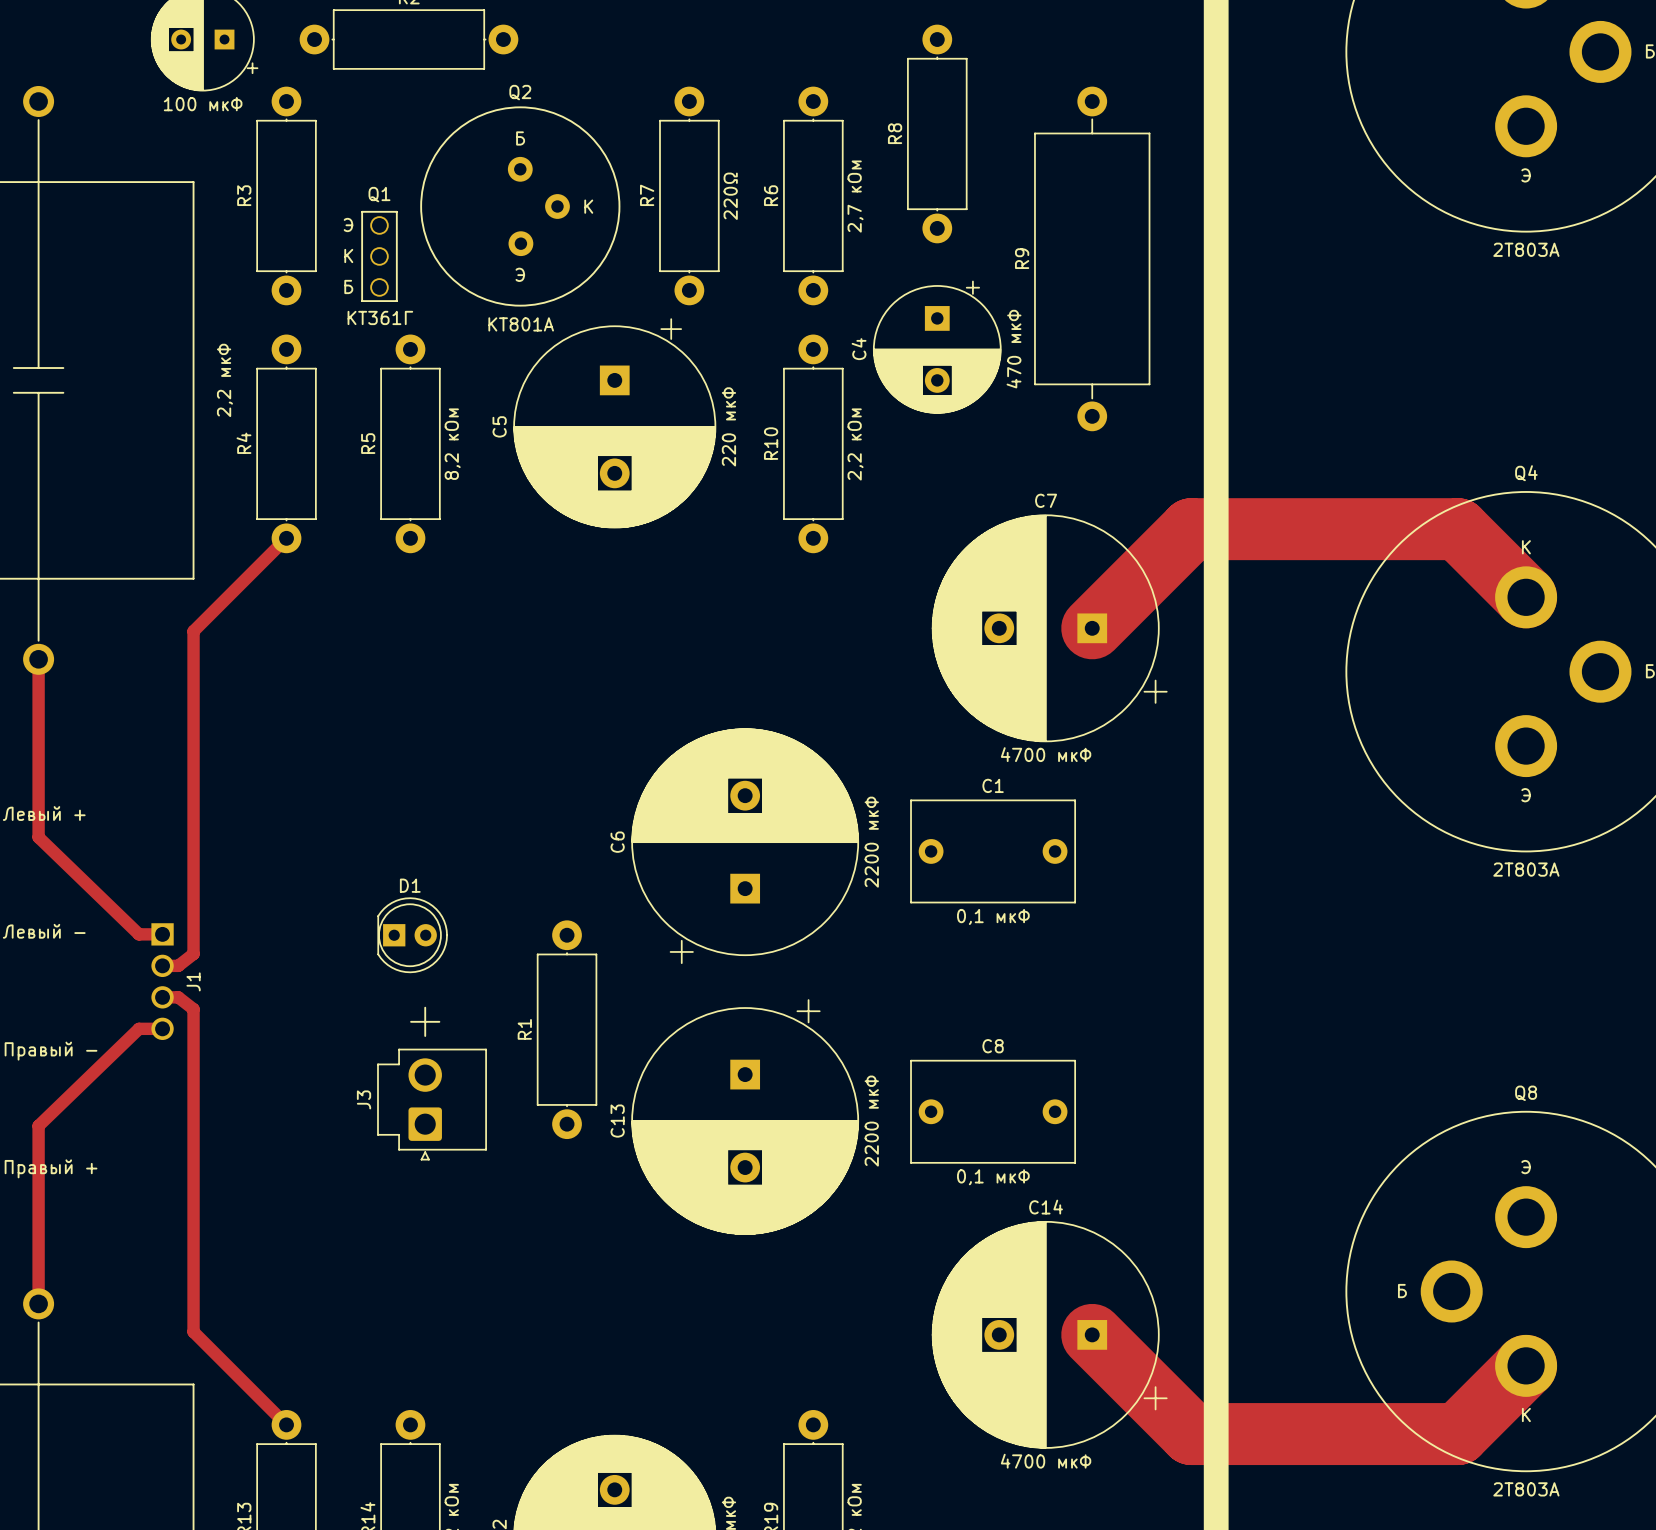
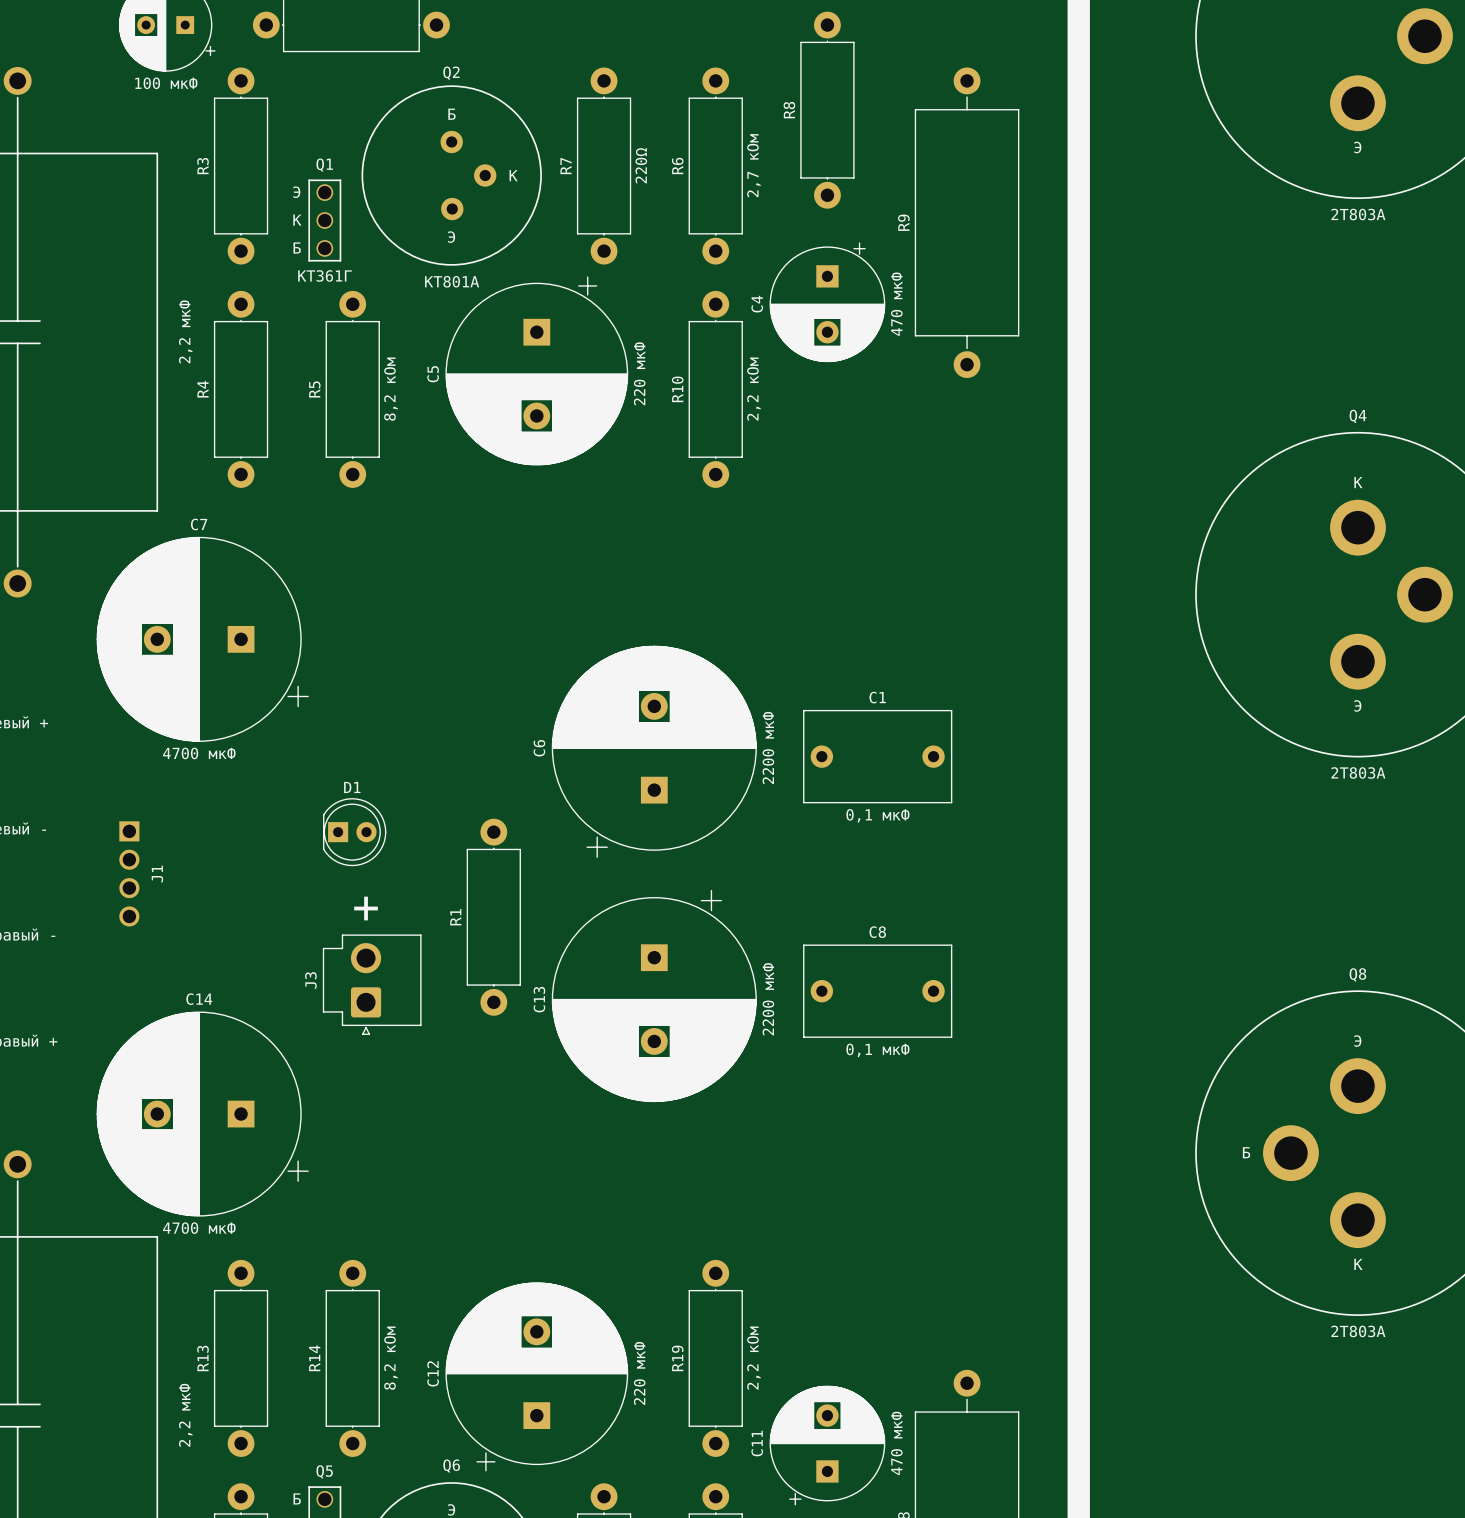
track: (286, 538) (193, 631) (193, 954) (178, 965) (162, 965) -> none
track: (1526, 597) (1457, 529) (1191, 529) (1092, 628) -> none
C7 position: (1049, 628) -> (202, 639)
track: (38, 659) (38, 837) (139, 934) (162, 934) -> none
track: (162, 997) (178, 997) (193, 1009) (193, 1331) (286, 1424) -> none
track: (162, 1028) (139, 1028) (38, 1125) (38, 1303) -> none
C14 position: (1049, 1334) -> (202, 1114)
track: (1092, 1334) (1191, 1434) (1457, 1434) (1526, 1365) -> none

